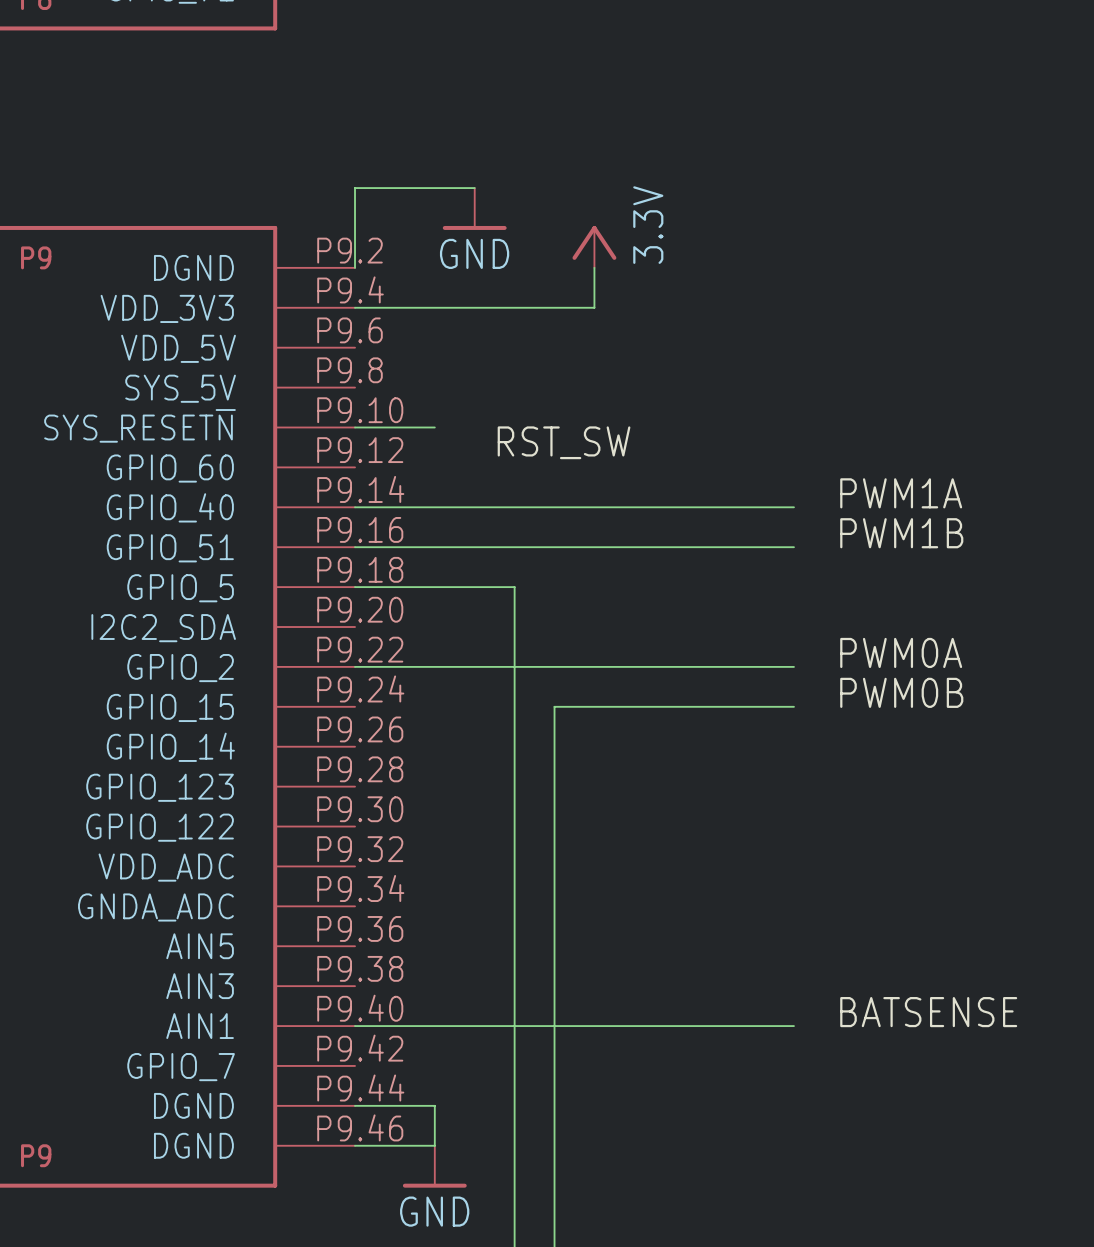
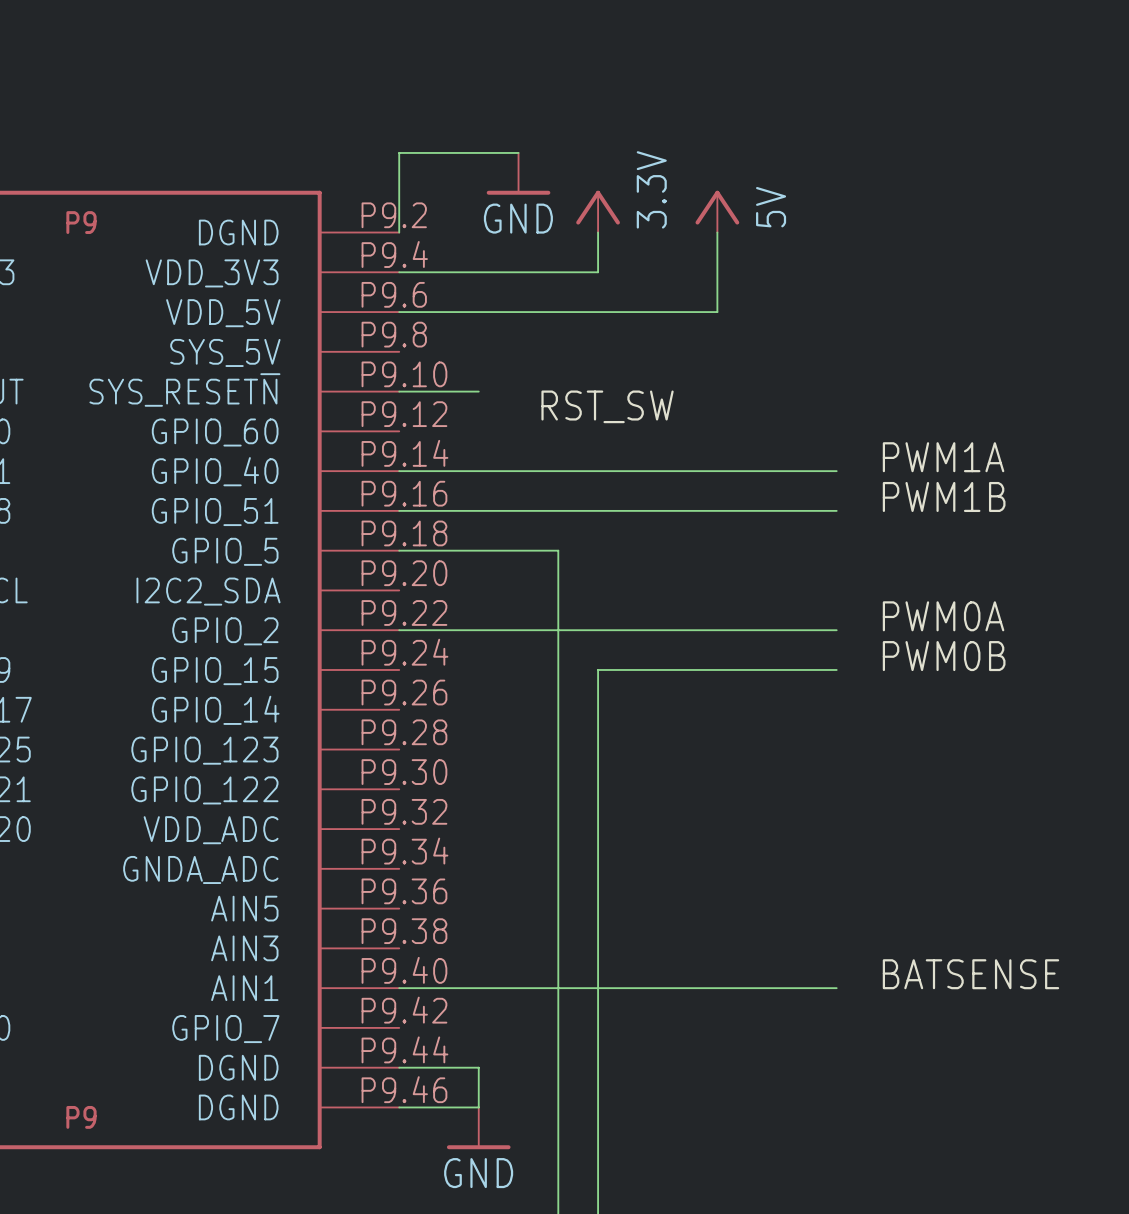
power symbol position: 3.3V (594, 246) -> 3.3V (598, 211)
power symbol: none -> 5V (717, 211)
wire: (594, 267) (594, 307) (554, 307) -> (598, 232) (598, 272)
wire: none -> (717, 232) (717, 312) (399, 312)

